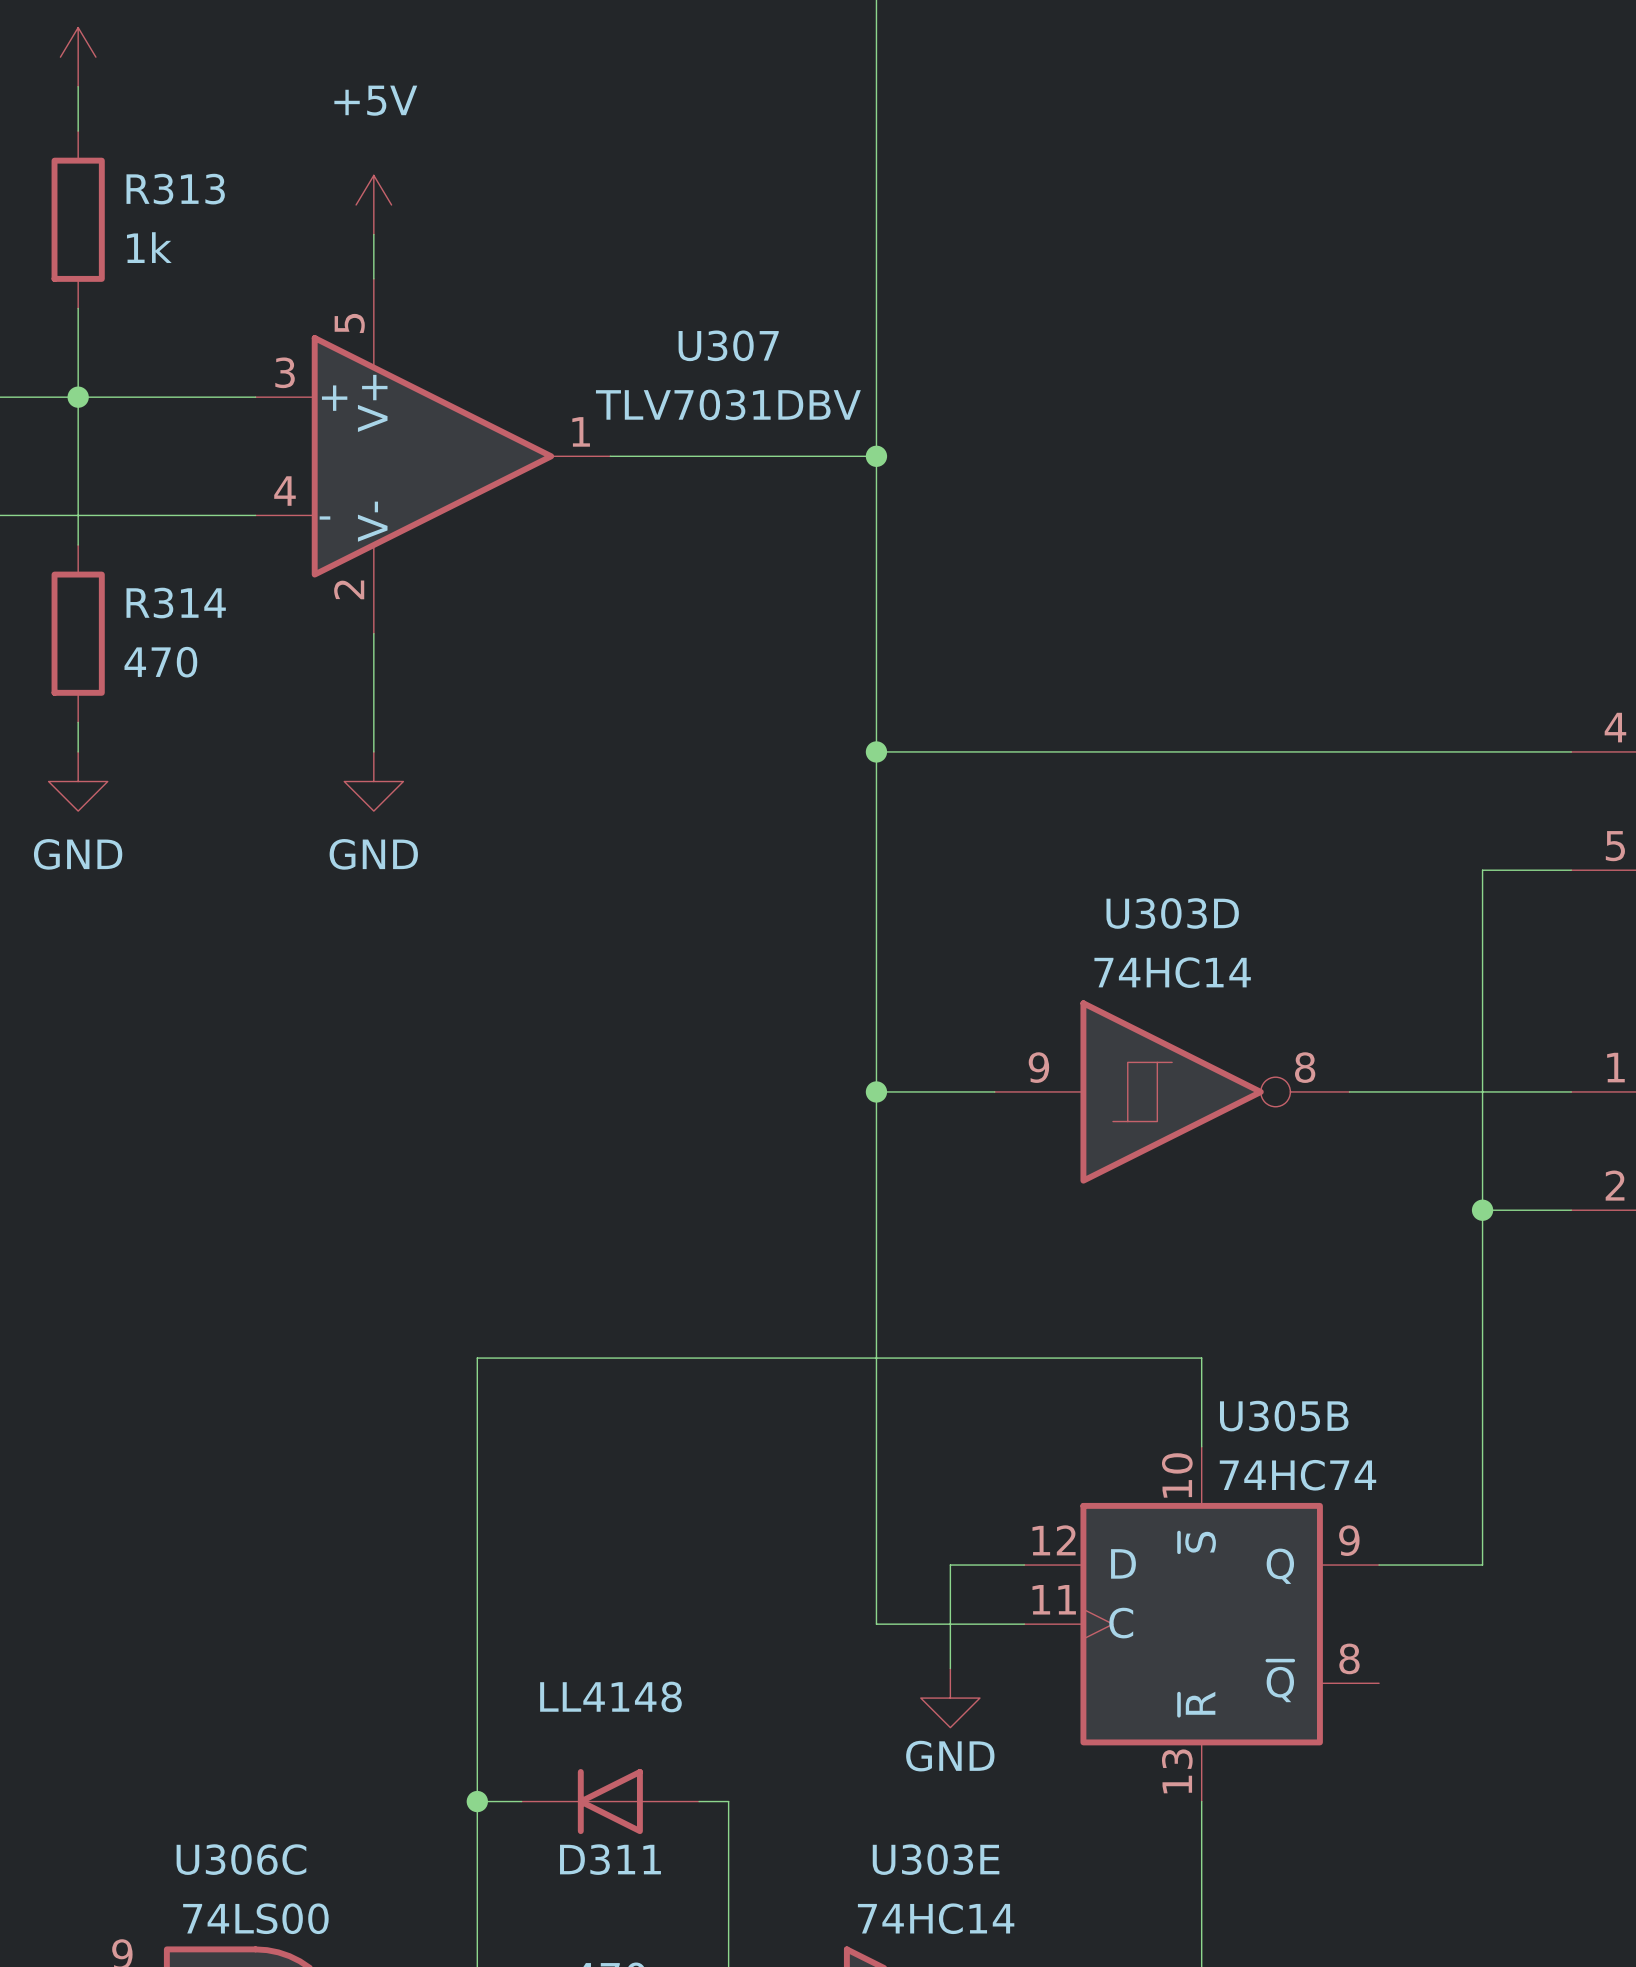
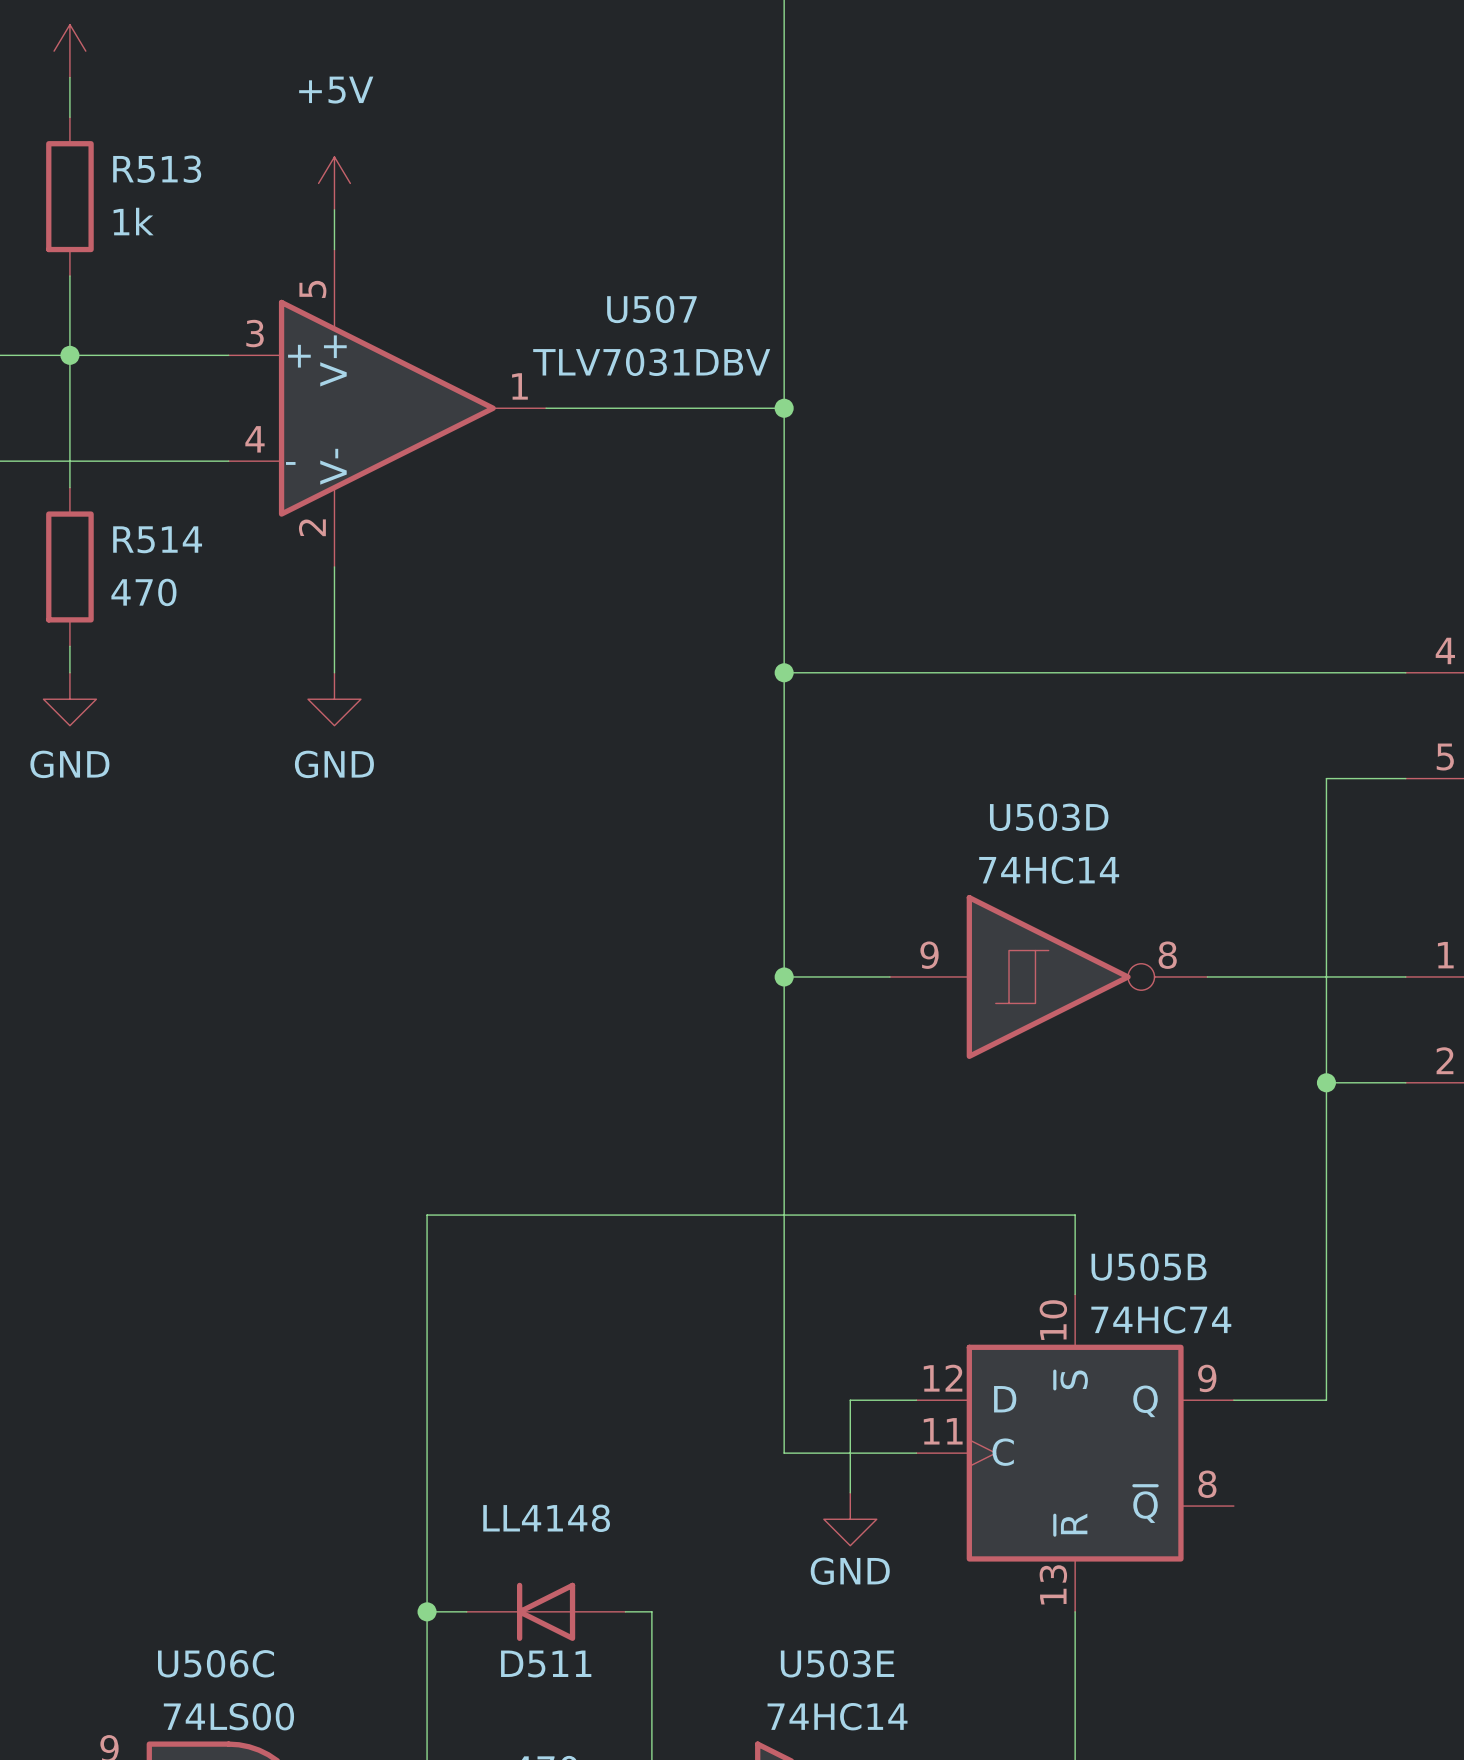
R313 name: R313 (175, 189) -> R513 (157, 169)
U307 name: U307 (728, 345) -> U507 (651, 309)
R314 name: R314 (176, 603) -> R514 (157, 539)
U303D name: U303D (1172, 913) -> U503D (1049, 817)
U305B name: U305B (1284, 1416) -> U505B (1149, 1266)
U306C name: U306C (241, 1859) -> U506C (216, 1663)
D311 name: D311 (610, 1859) -> D511 (546, 1664)
U303E name: U303E (936, 1859) -> U503E (837, 1663)

